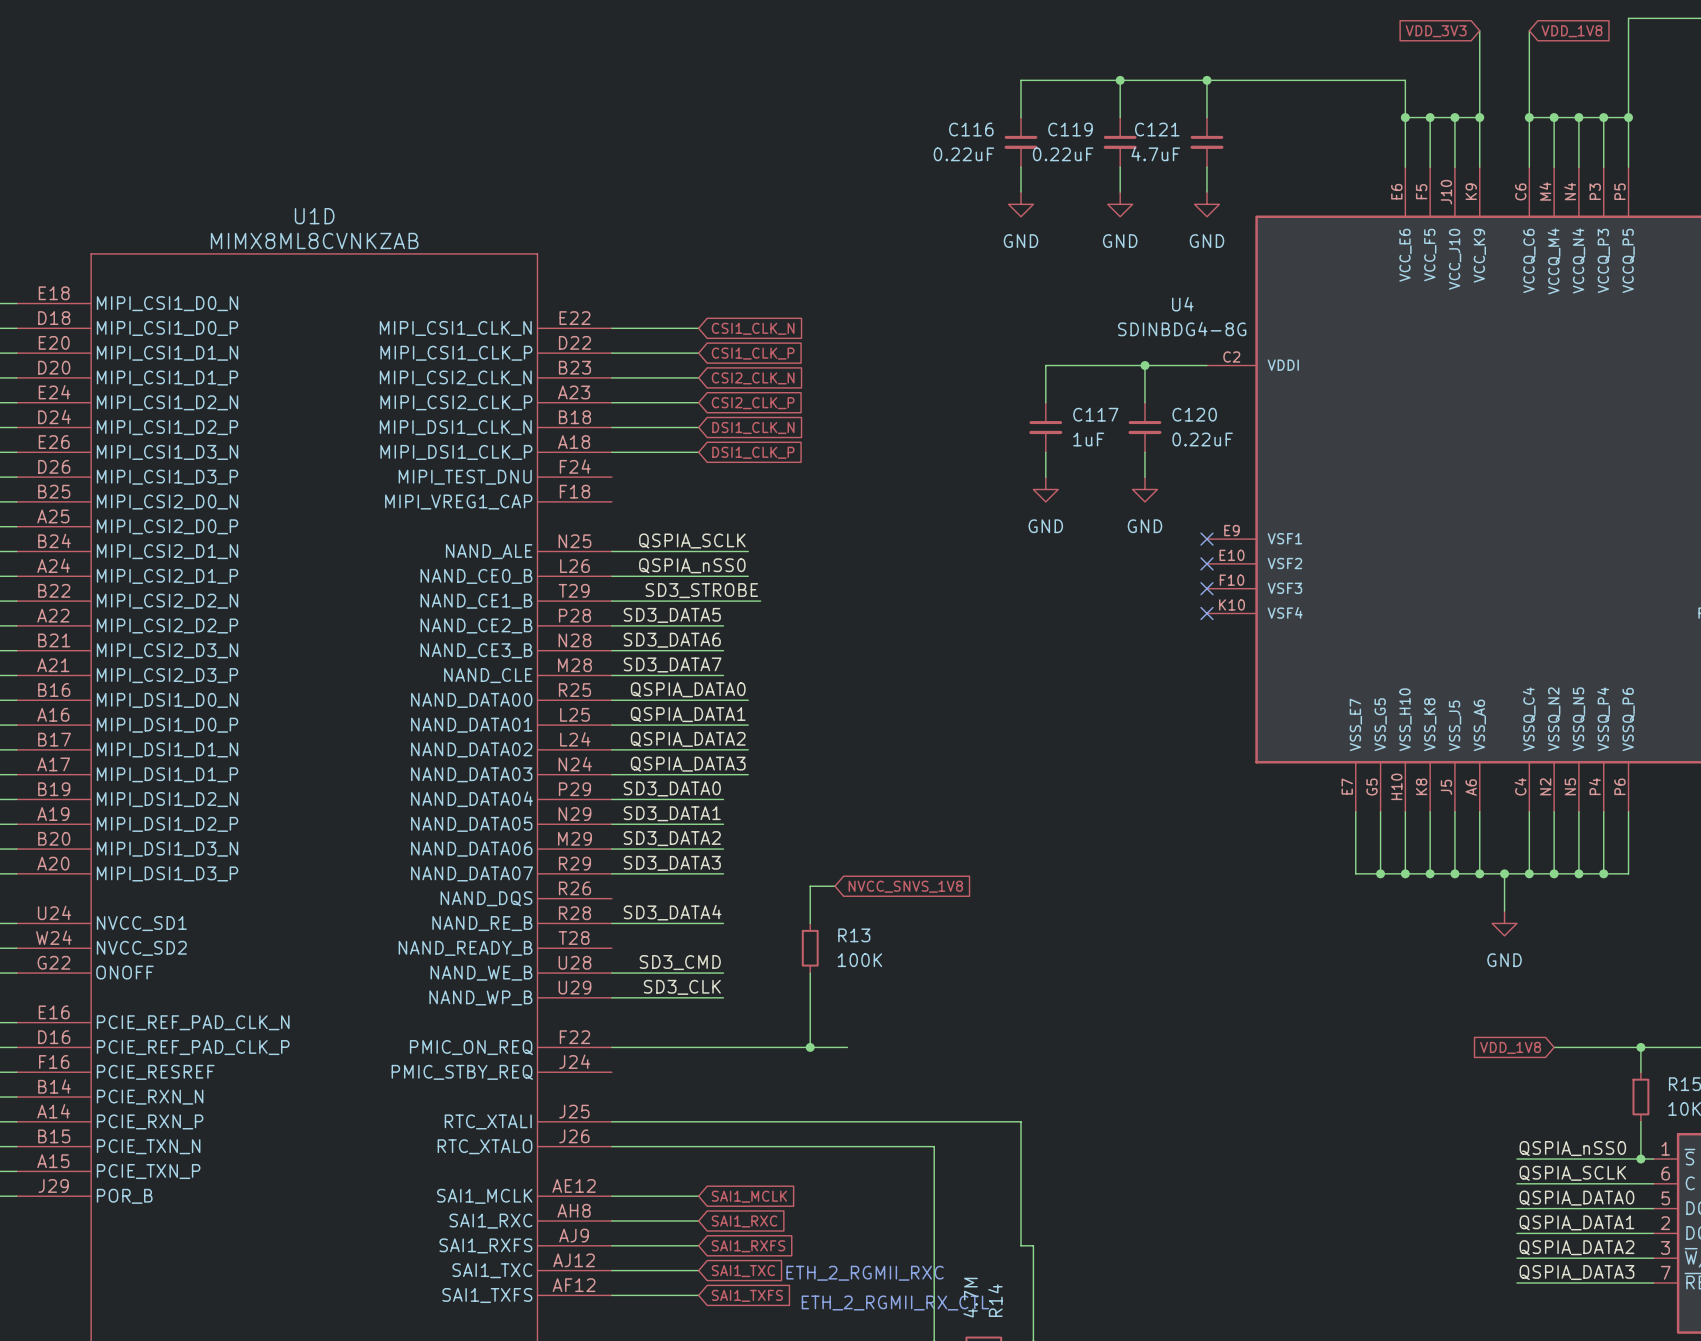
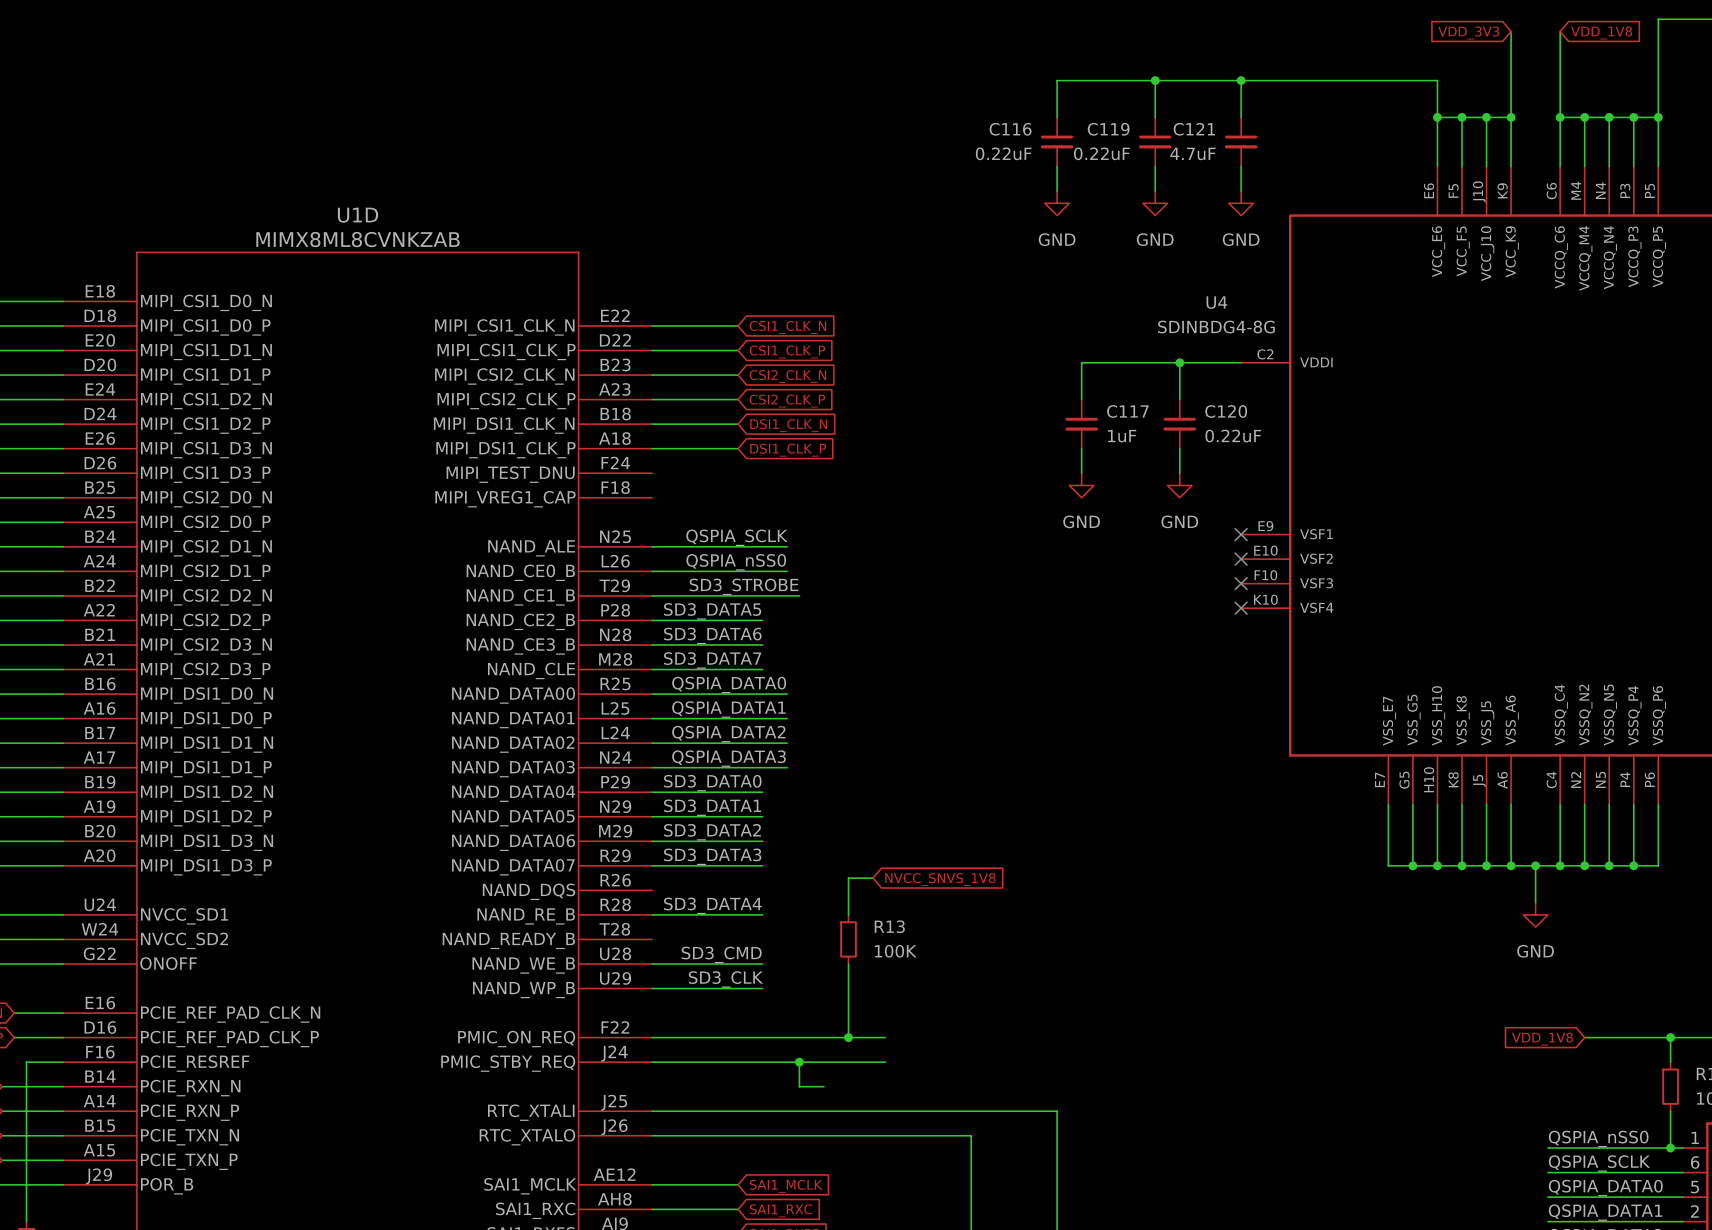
wire: none -> (652, 1062) (885, 1062)
wire: none -> (799, 1062) (799, 1086) (823, 1086)
junction: none -> (799, 1062)

